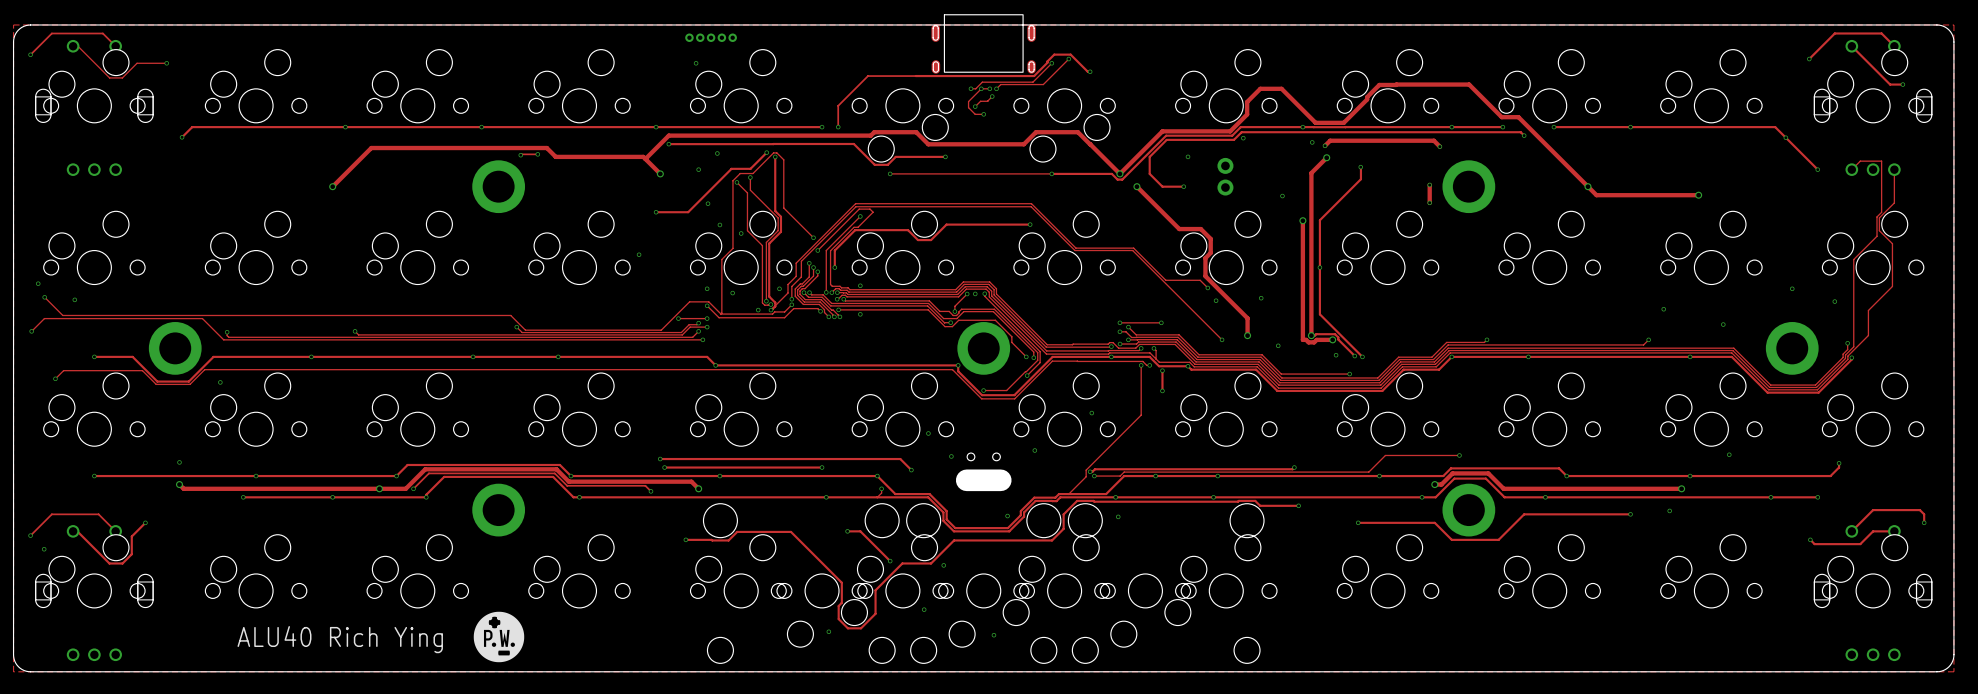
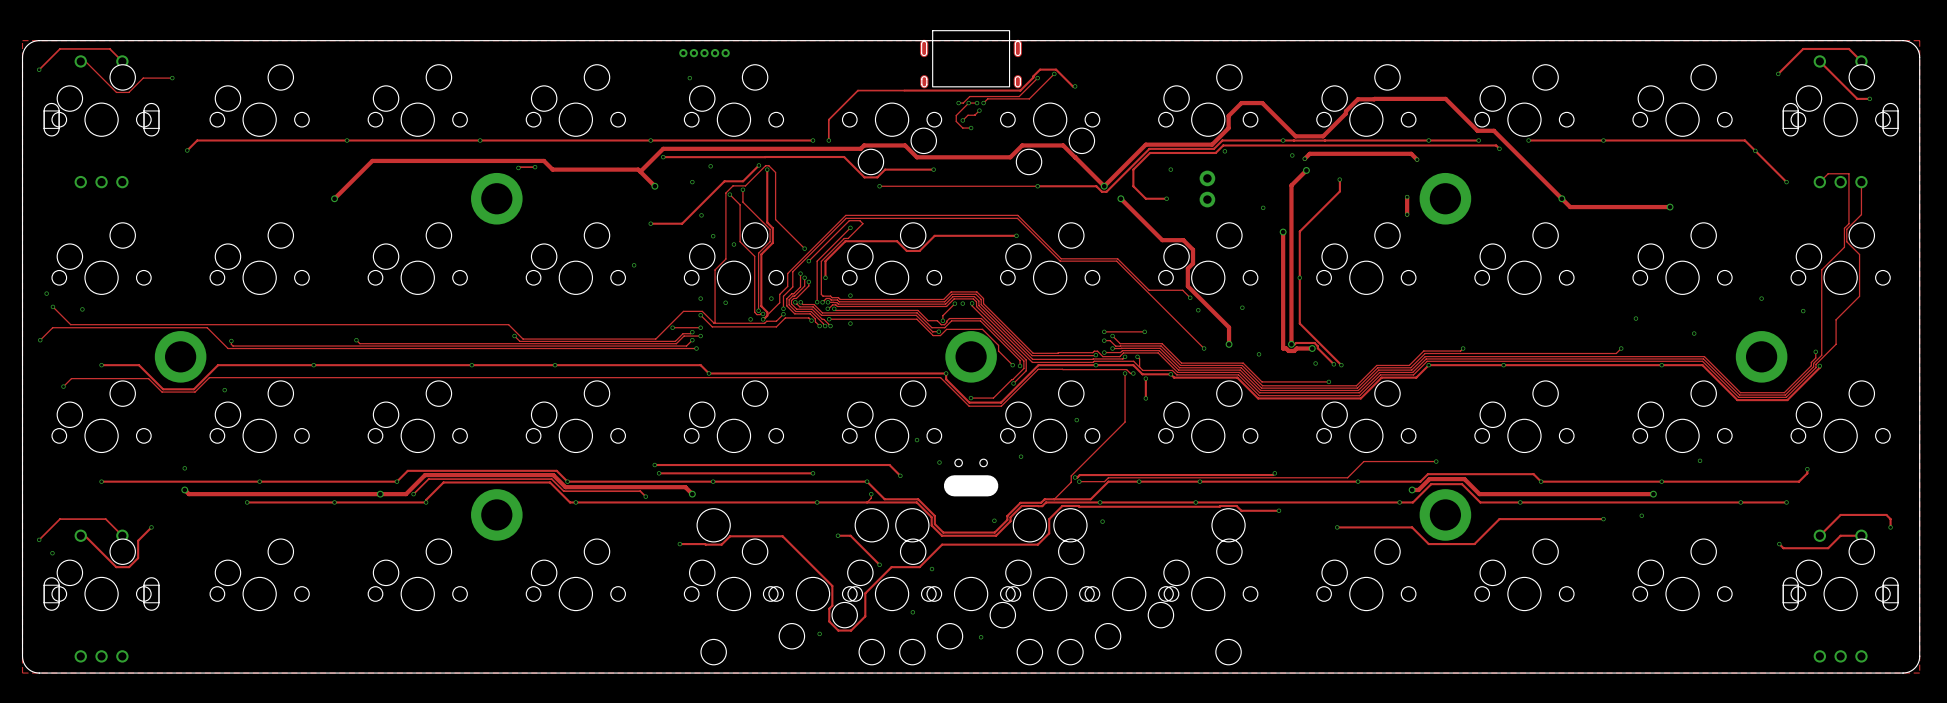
drawing: [473, 611, 525, 663] -> none
text: ALU40 Rich Ying (340, 639) -> none

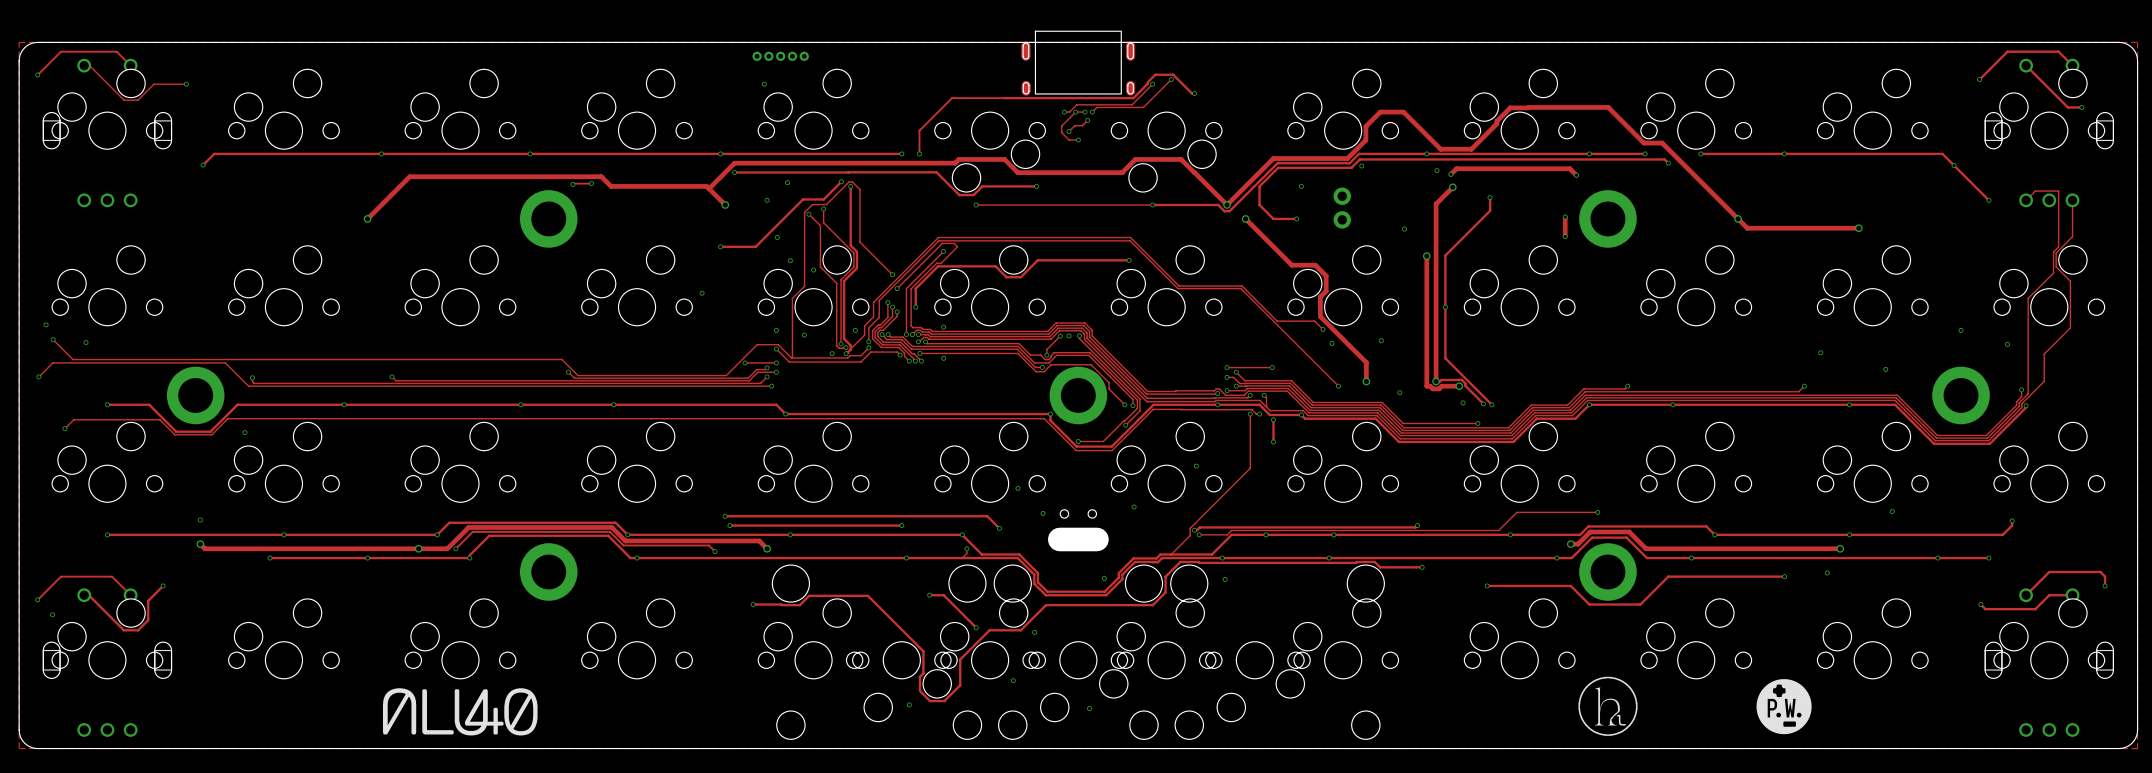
drawing: none -> [1578, 676, 1638, 736]
drawing: none -> [1756, 679, 1812, 735]
drawing: none -> [382, 688, 538, 736]

